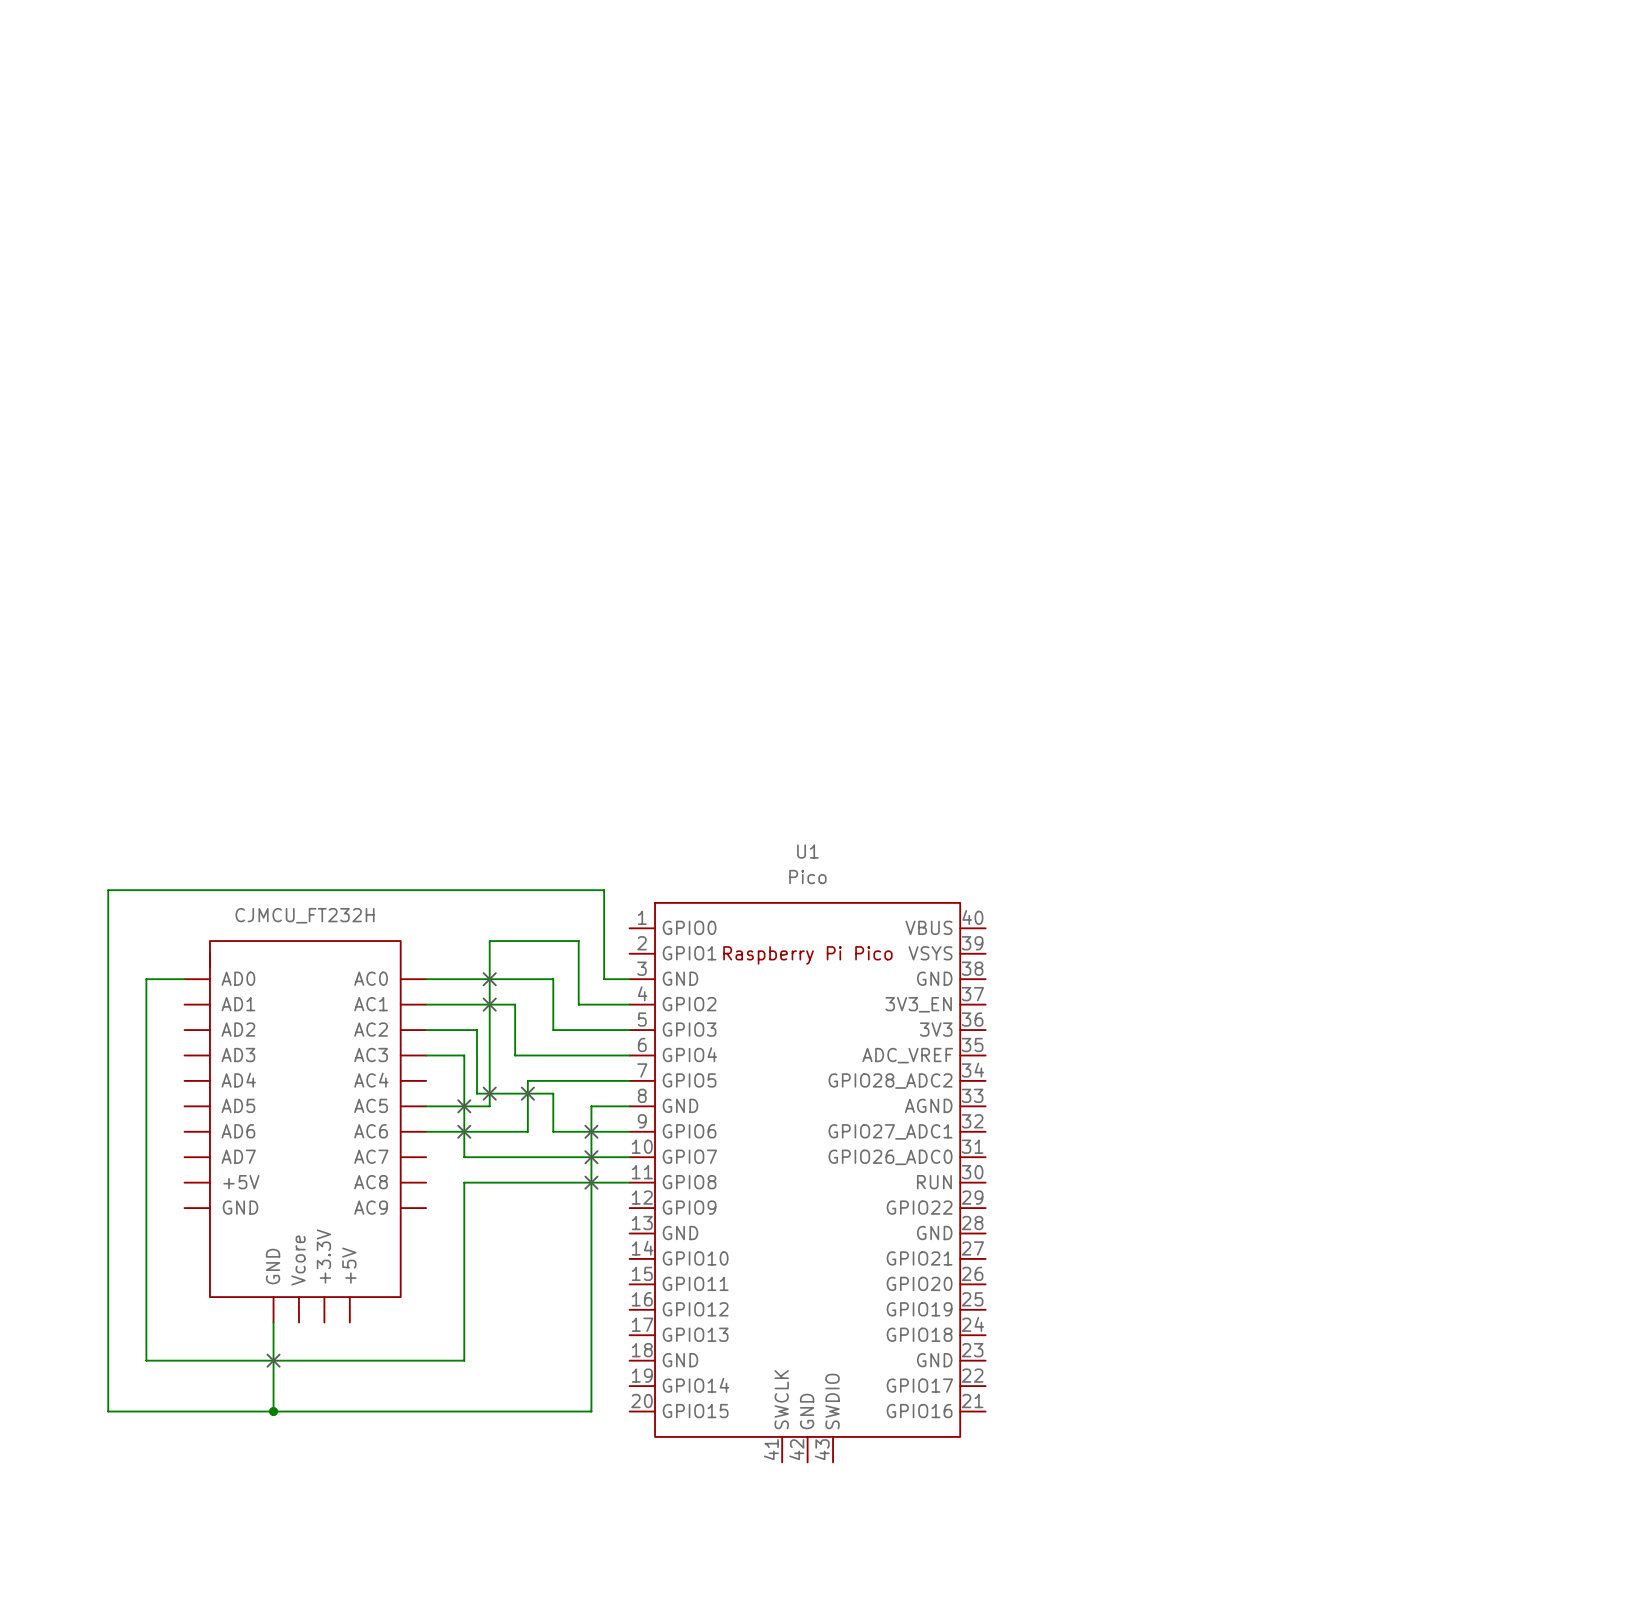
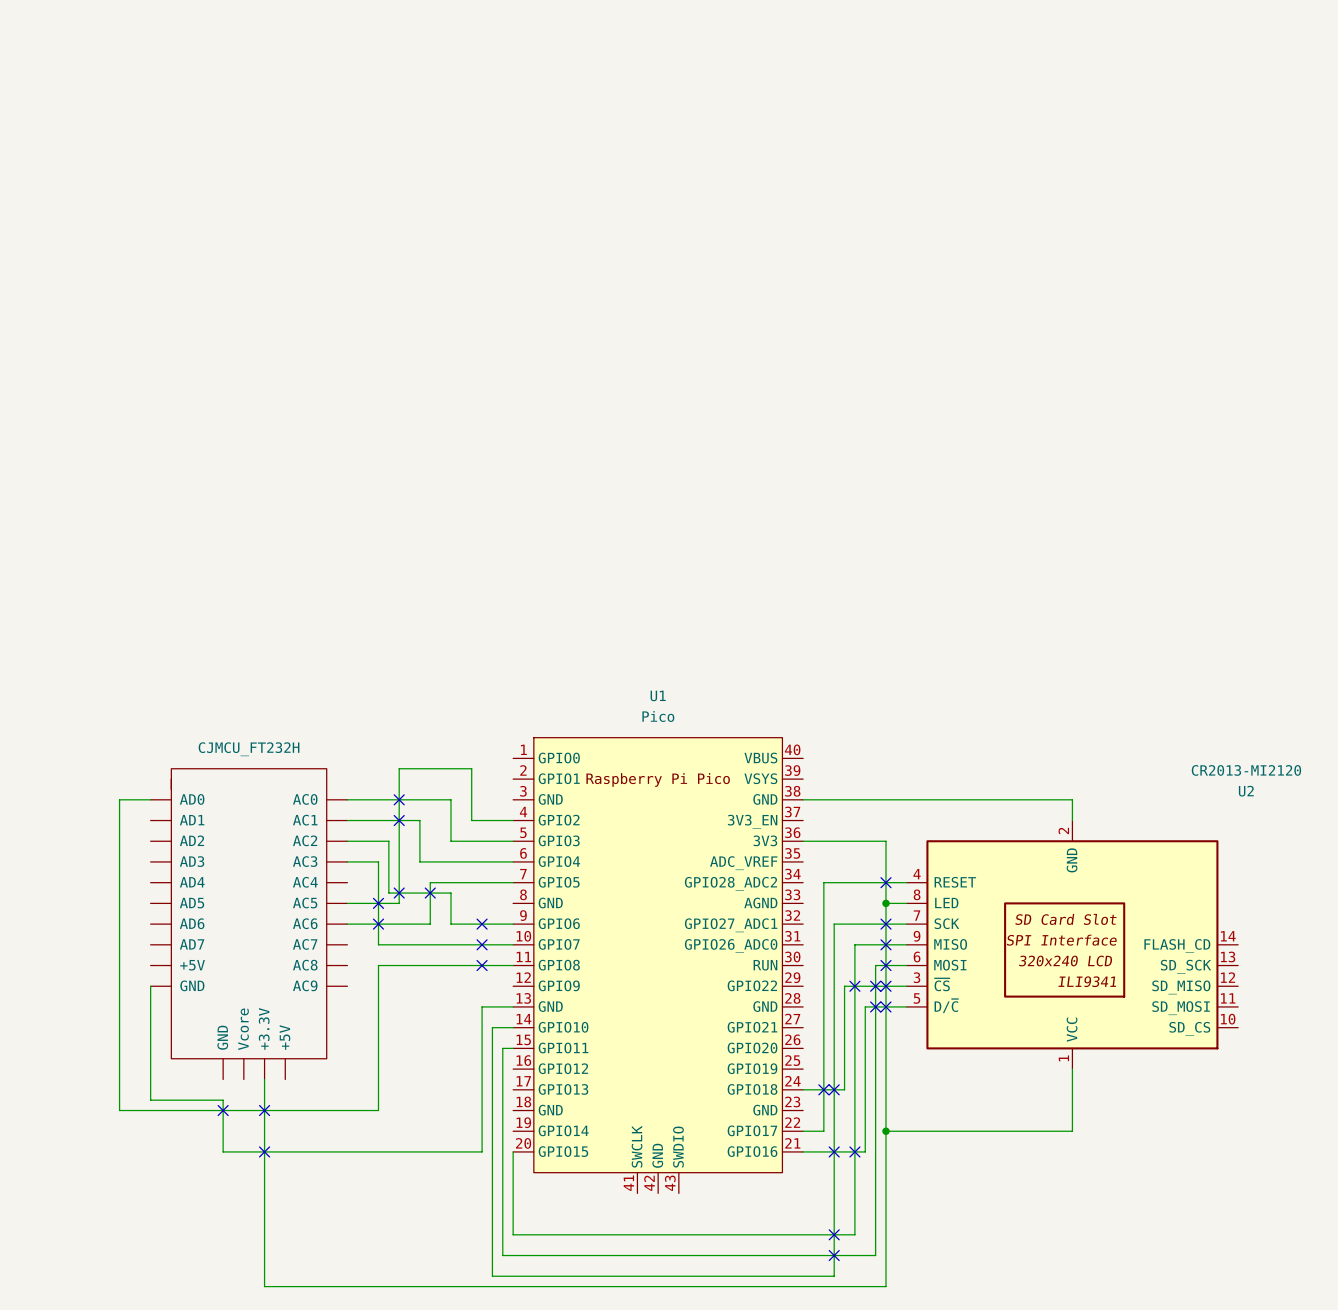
wire: (629, 979) (604, 979) (604, 890) (108, 890) (108, 1411) (273, 1411) -> none
wire: none -> (803, 799) (1072, 799) (1072, 820)
wire: none -> (803, 841) (885, 841) (885, 1286) (264, 1286) (264, 1079)
no-connect mark: none -> (885, 882)
wire: none -> (906, 882) (823, 882) (823, 1131) (803, 1131)
wire: (629, 1106) (591, 1106) (591, 1233) -> (513, 1006) (482, 1006)
wire: none -> (885, 903) (906, 903)
junction: none -> (885, 903)
no-connect mark: none -> (885, 924)
wire: none -> (906, 924) (834, 924) (834, 1276) (492, 1276) (492, 1027) (513, 1027)
no-connect mark: none -> (885, 944)
wire: none -> (906, 944) (854, 944) (854, 1234) (513, 1234) (513, 1151)
U2: none -> CR2013-MI2120 (1072, 944)
no-connect mark: none -> (885, 965)
wire: none -> (906, 965) (875, 965) (875, 1255) (502, 1255) (502, 1048) (513, 1048)
no-connect mark: none -> (854, 986)
no-connect mark: none -> (875, 986)
no-connect mark: none -> (885, 986)
wire: none -> (906, 986) (844, 986) (844, 1089) (803, 1089)
no-connect mark: none -> (875, 1006)
no-connect mark: none -> (885, 1006)
wire: none -> (906, 1006) (865, 1006) (865, 1151) (803, 1151)
wire: none -> (1072, 1069) (1072, 1131) (885, 1131)
wire: (273, 1322) (273, 1347) -> (150, 986) (150, 1100) (223, 1100)
no-connect mark: none -> (823, 1089)
no-connect mark: none -> (834, 1089)
no-connect mark: none -> (264, 1110)
junction: none -> (885, 1131)
junction: (273, 1411) -> none
no-connect mark: none -> (264, 1151)
no-connect mark: none -> (834, 1151)
no-connect mark: none -> (854, 1151)
no-connect mark: none -> (834, 1234)
no-connect mark: none -> (834, 1255)

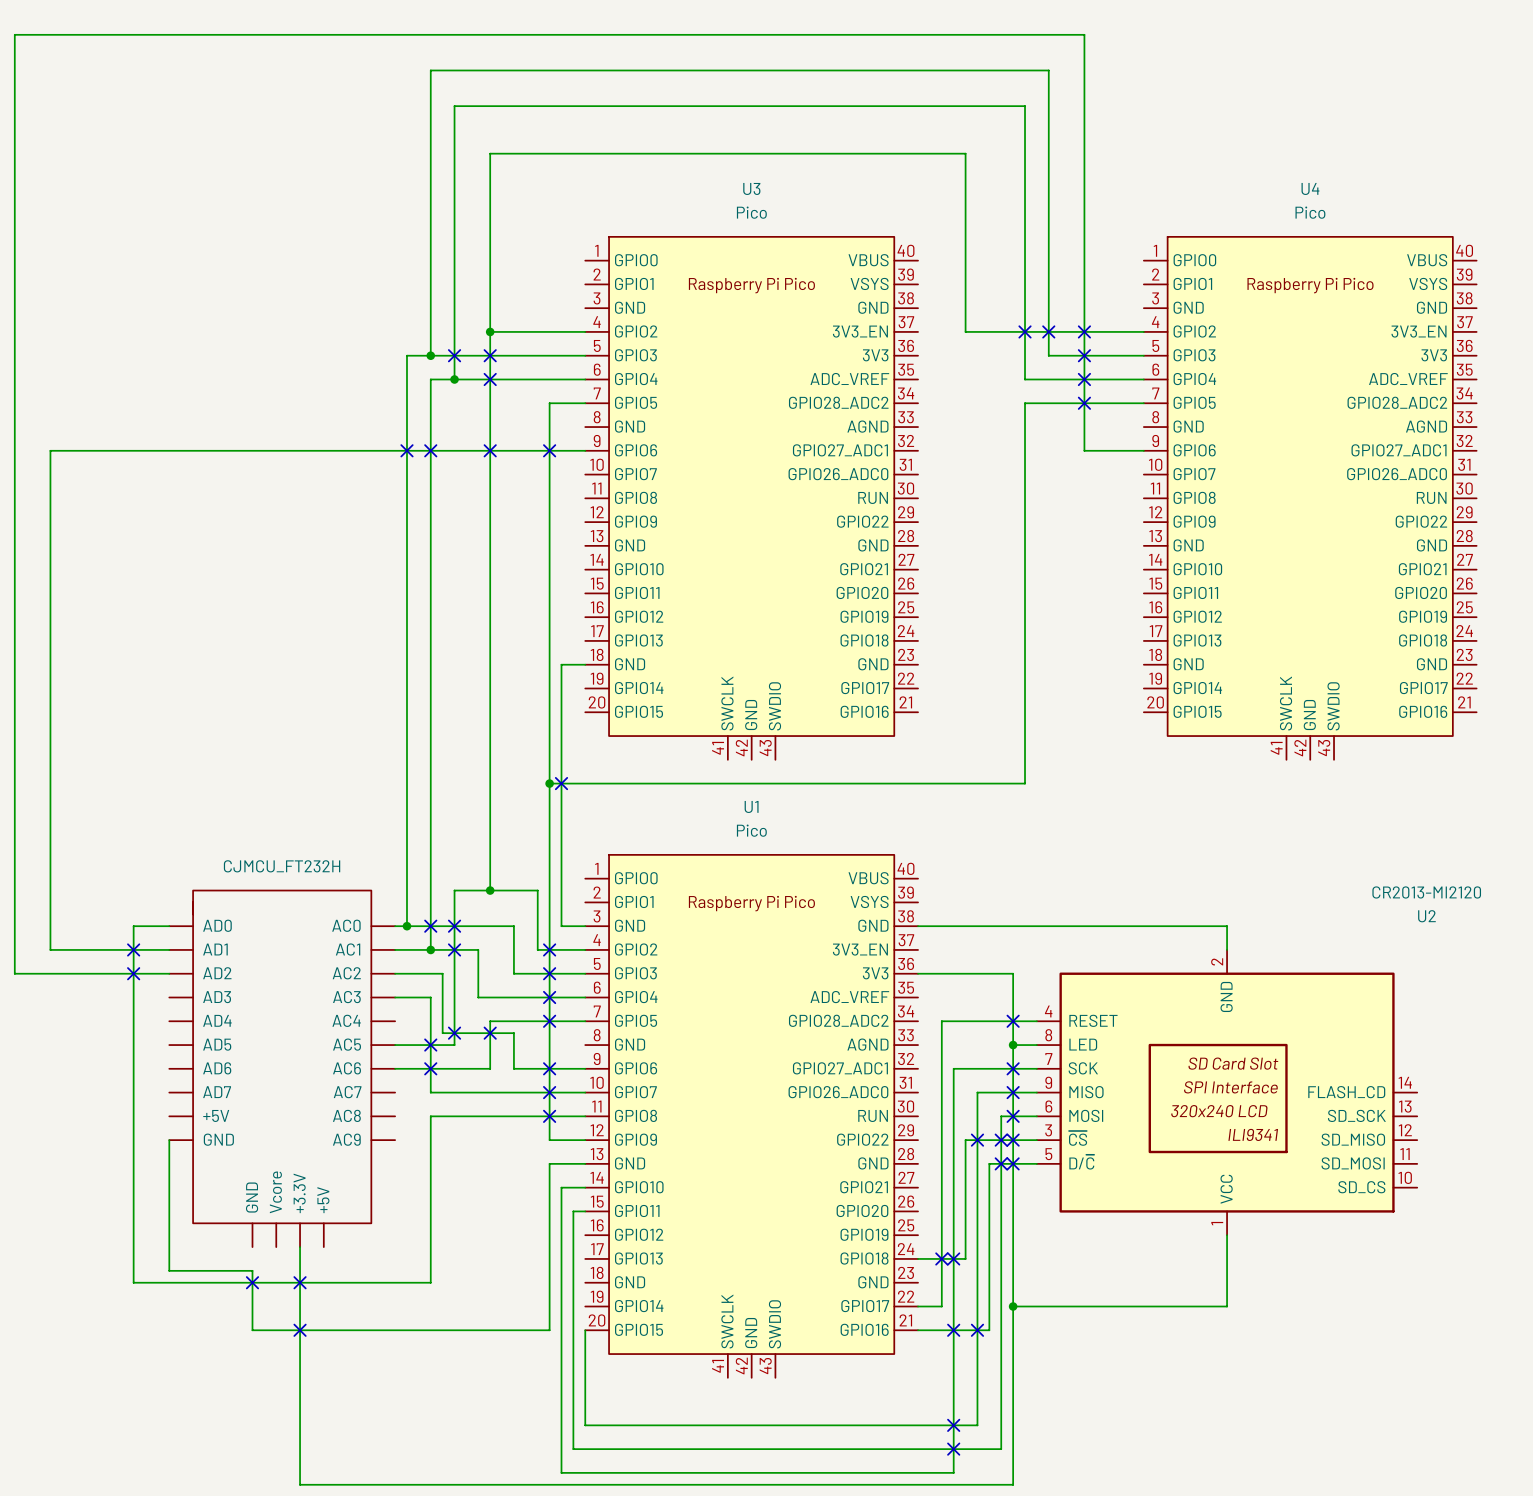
wire: none -> (490, 331) (585, 331)
junction: none -> (490, 331)
no-connect mark: none -> (1025, 331)
no-connect mark: none -> (1048, 331)
no-connect mark: none -> (1084, 331)
wire: none -> (1143, 331) (965, 331) (965, 153) (490, 153) (490, 890)
wire: none -> (430, 355) (430, 70) (1048, 70) (1048, 355) (1143, 355)
junction: none -> (430, 355)
no-connect mark: none -> (454, 355)
no-connect mark: none -> (490, 355)
wire: none -> (585, 355) (406, 355) (406, 926)
no-connect mark: none -> (1084, 355)
wire: none -> (454, 379) (454, 106) (1025, 106) (1025, 379) (1143, 379)
junction: none -> (454, 379)
no-connect mark: none -> (490, 379)
wire: none -> (585, 379) (430, 379) (430, 949)
no-connect mark: none -> (1084, 379)
wire: none -> (585, 403) (549, 403) (549, 1140) (585, 1140)
no-connect mark: none -> (1084, 403)
wire: none -> (1143, 403) (1025, 403) (1025, 783) (549, 783)
no-connect mark: none -> (406, 450)
no-connect mark: none -> (430, 450)
no-connect mark: none -> (490, 450)
no-connect mark: none -> (549, 450)
wire: none -> (585, 450) (50, 450) (50, 949) (169, 949)
wire: none -> (1143, 450) (1084, 450) (1084, 34) (14, 34) (14, 973) (169, 973)
U3: none -> Pico (751, 498)
U4: none -> Pico (1310, 498)
wire: none -> (585, 664) (561, 664) (561, 926) (585, 926)
junction: none -> (549, 783)
no-connect mark: none -> (561, 783)
junction: none -> (490, 890)
junction: none -> (406, 926)
no-connect mark: none -> (430, 926)
no-connect mark: none -> (133, 949)
junction: none -> (430, 949)
no-connect mark: none -> (549, 949)
no-connect mark: none -> (133, 973)
no-connect mark: none -> (549, 973)
no-connect mark: none -> (549, 997)
no-connect mark: none -> (549, 1021)

